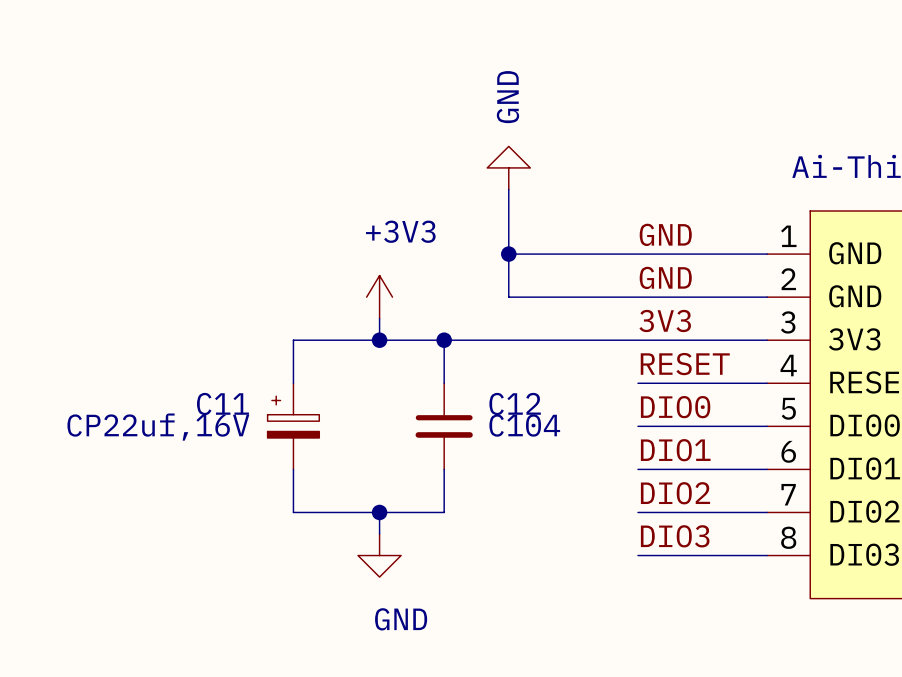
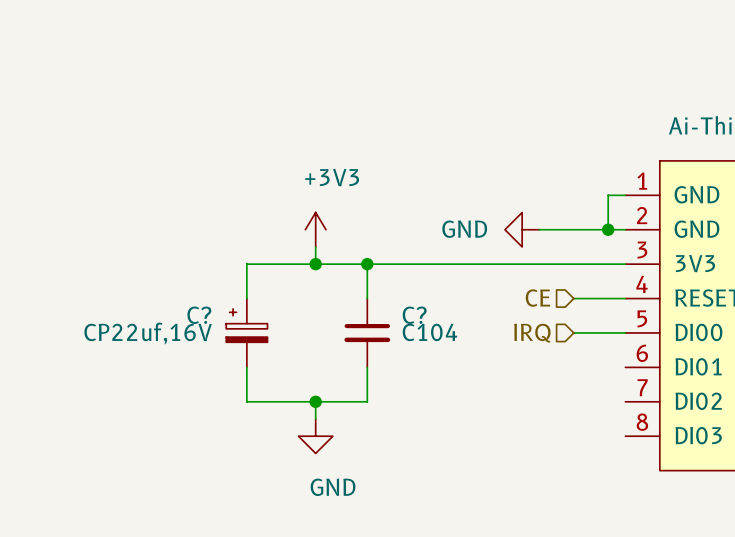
power symbol rotation: 0° (508, 167) -> 90° counterclockwise (522, 229)
power symbol position: GND (508, 167) -> GND (522, 229)
wire: (508, 189) (508, 297) (659, 297) -> none
label: GND (665, 234) -> none
wire: (508, 254) (745, 254) -> (608, 229) (608, 195)
junction: (508, 254) -> none
label: GND (665, 277) -> none
junction: none -> (608, 229)
label: 3V3 (665, 320) -> none
label: RESET (685, 364) -> none
hierarchical label: none -> CE (537, 298)
wire: (637, 383) (702, 383) -> none
C11 name: C11 (222, 404) -> C? (199, 315)
C12 name: C12 (515, 404) -> C? (414, 315)
label: DIO0 (675, 407) -> none
wire: (637, 426) (702, 426) -> none
hierarchical label: none -> IRQ (532, 333)
label: DIO1 (675, 450) -> none
wire: (637, 469) (767, 469) -> none
label: DIO2 (675, 493) -> none
wire: (637, 512) (767, 512) -> none
label: DIO3 (675, 536) -> none
wire: (637, 555) (767, 555) -> none

